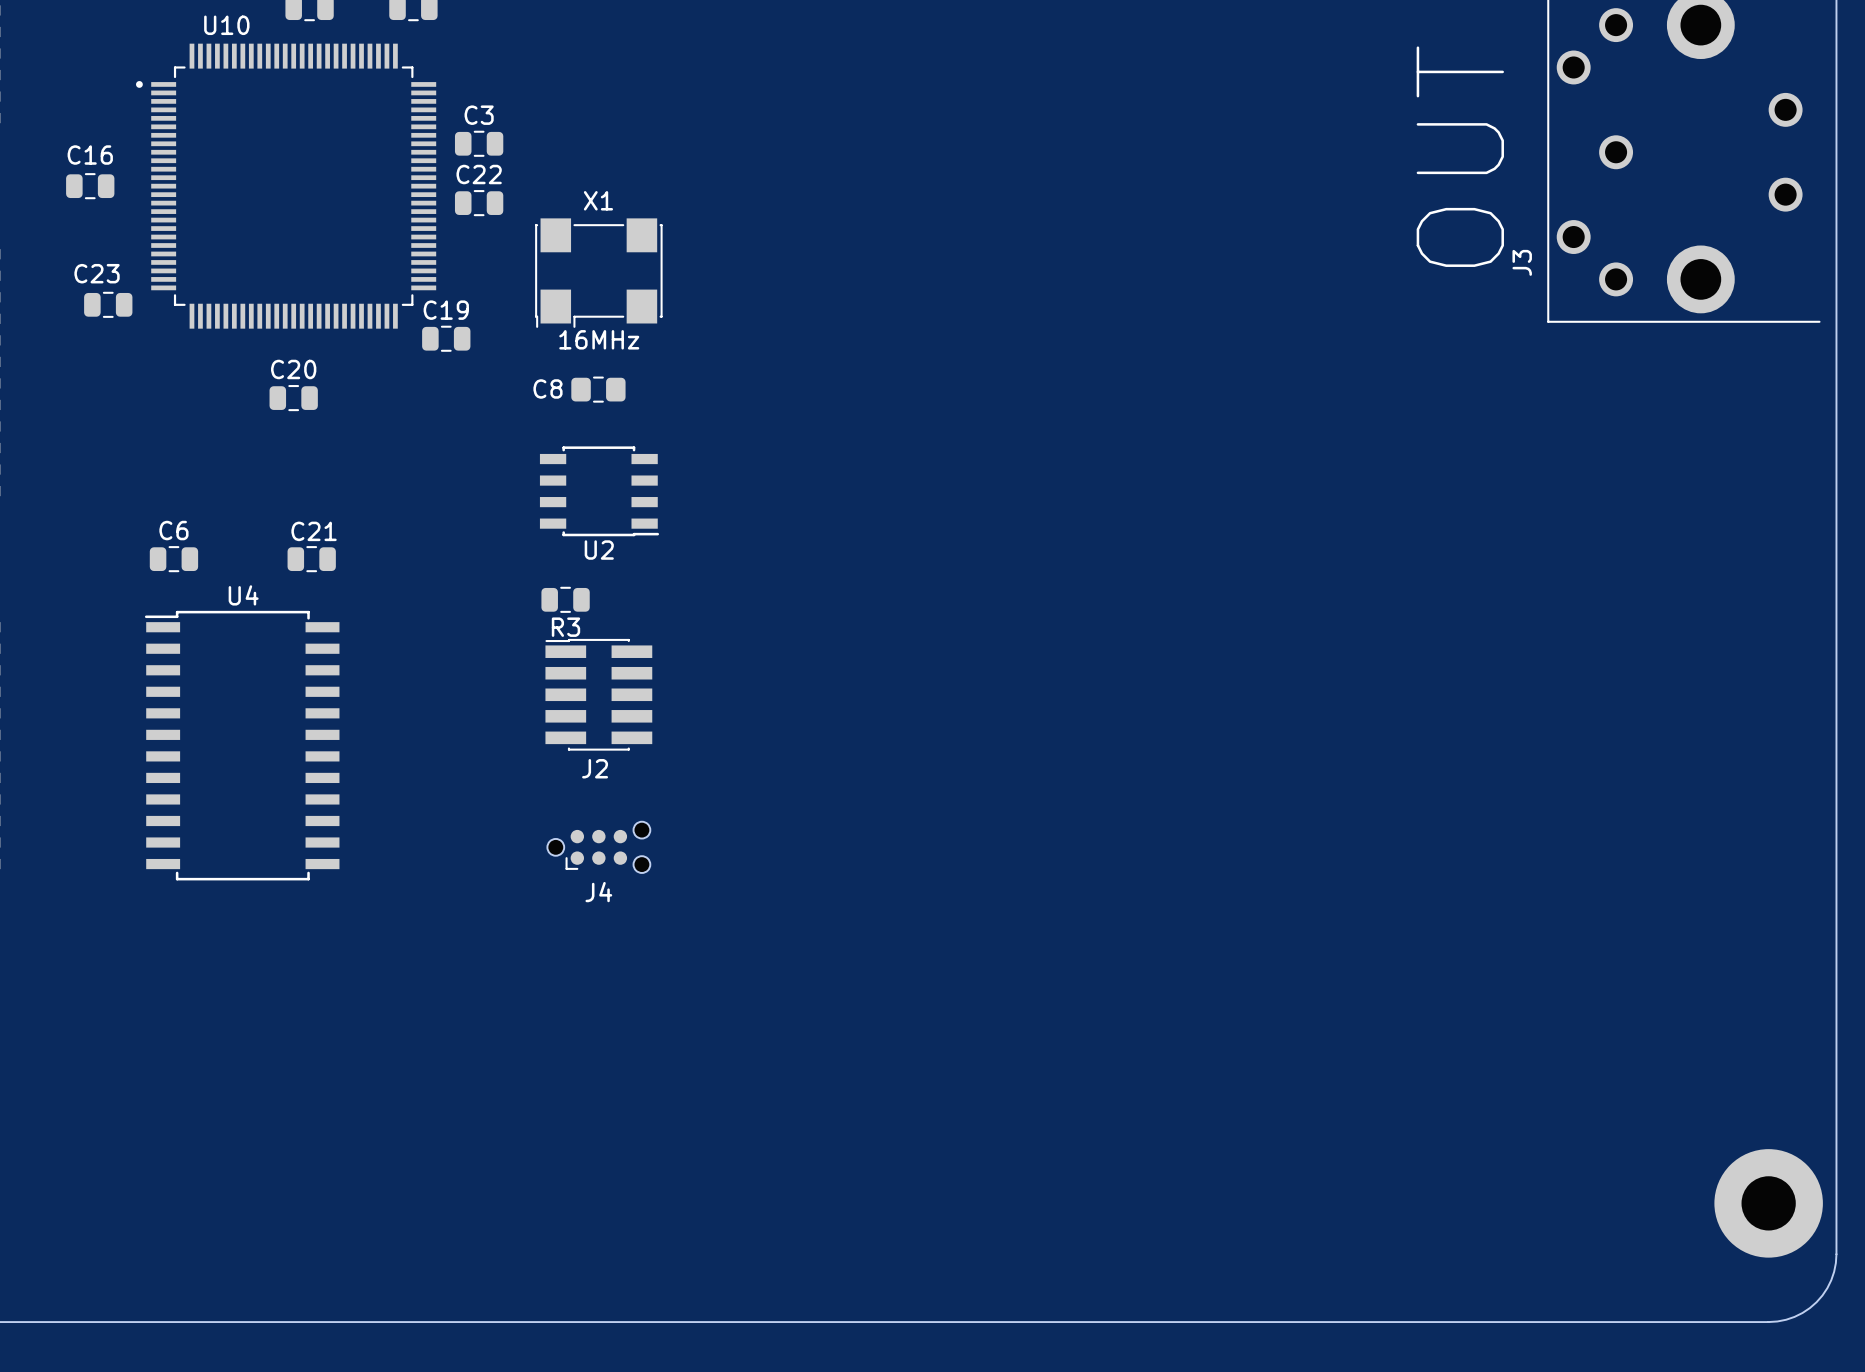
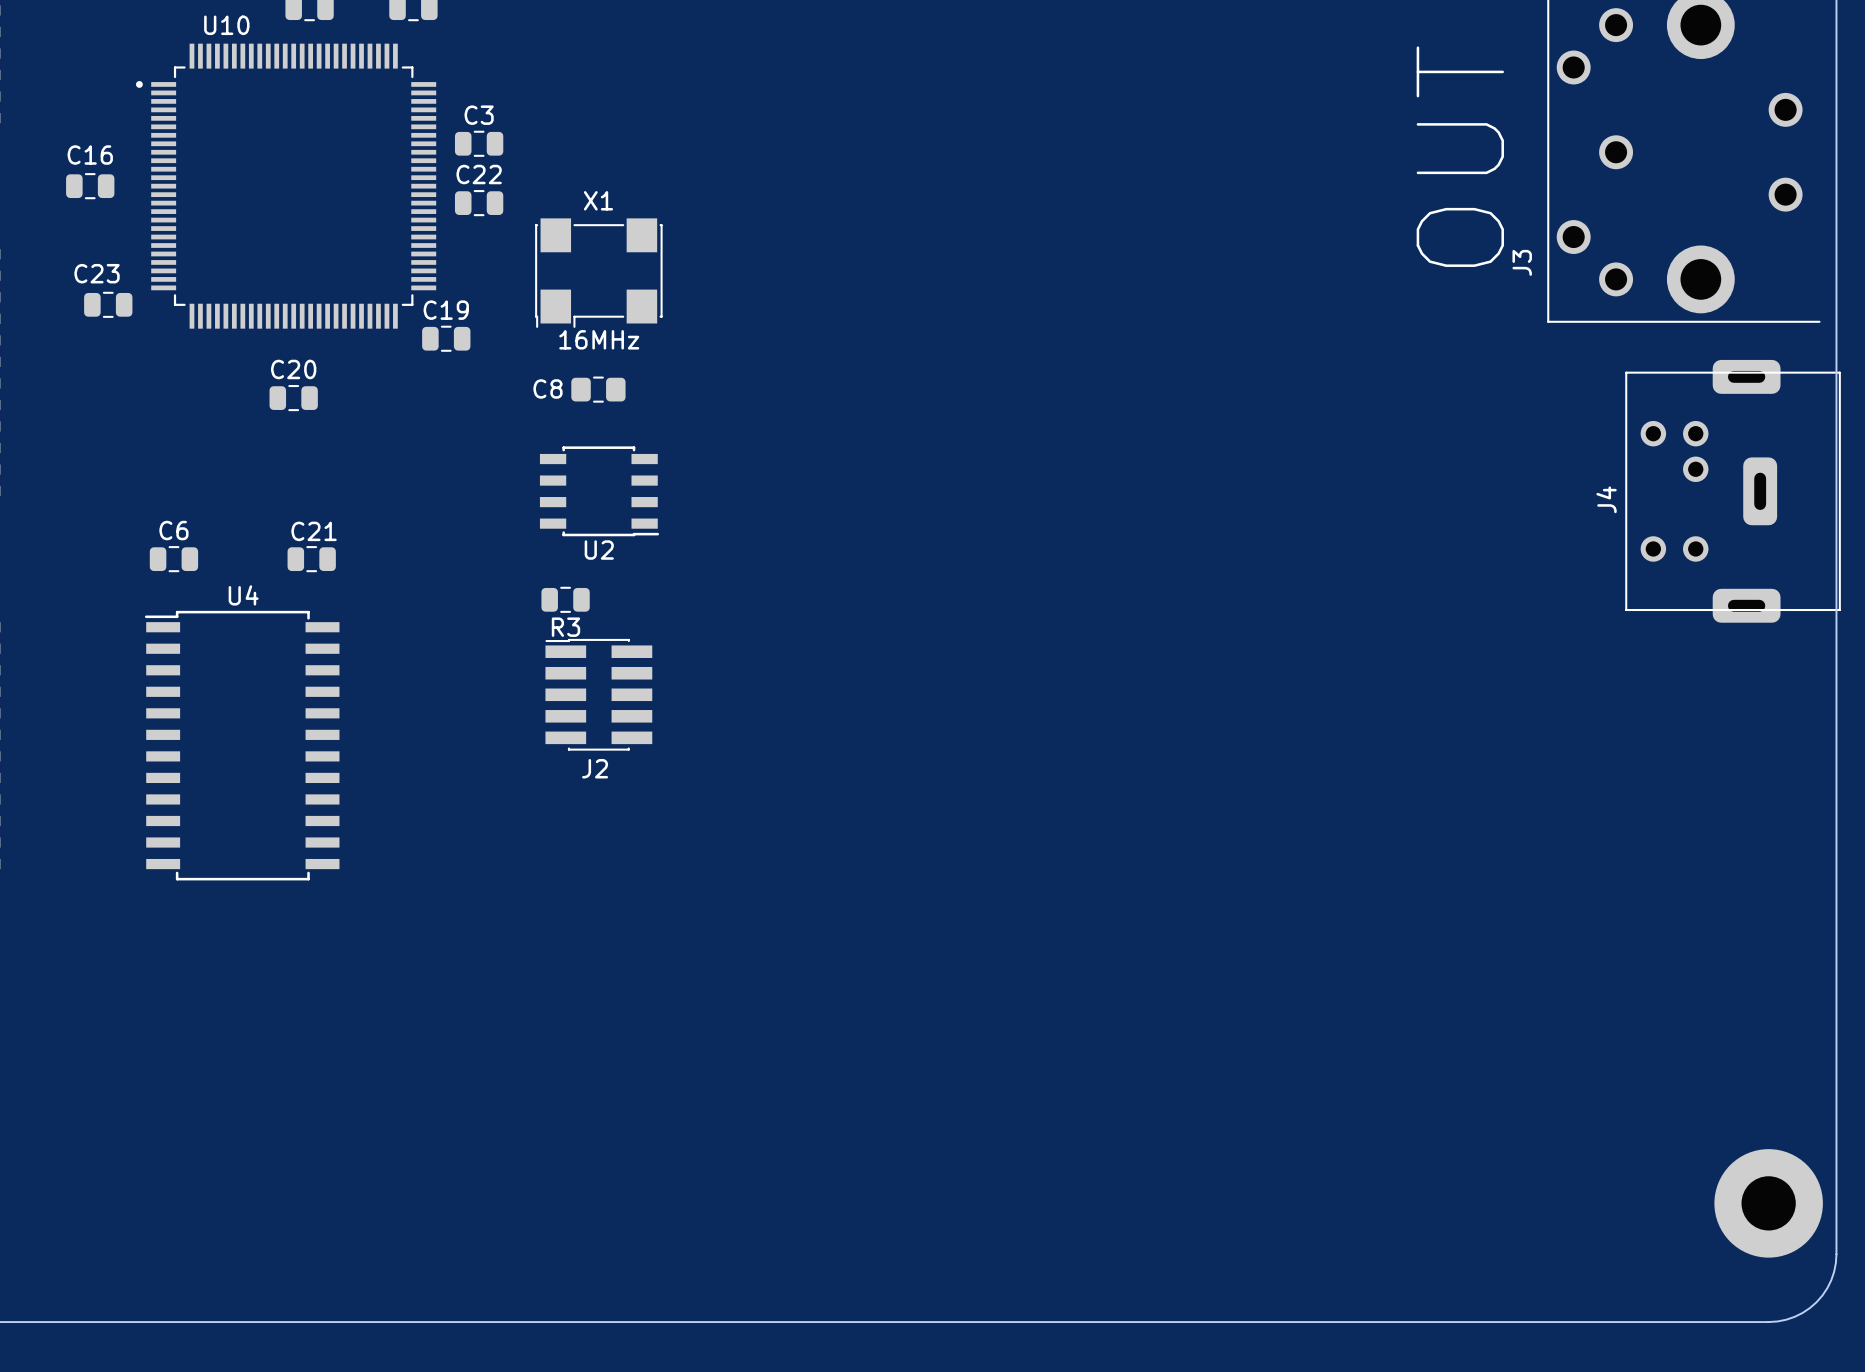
J4 footprint: [547, 821, 651, 873] -> [1625, 359, 1841, 623]
J4 name position: J4 (598, 892) -> J4 (1606, 499)

